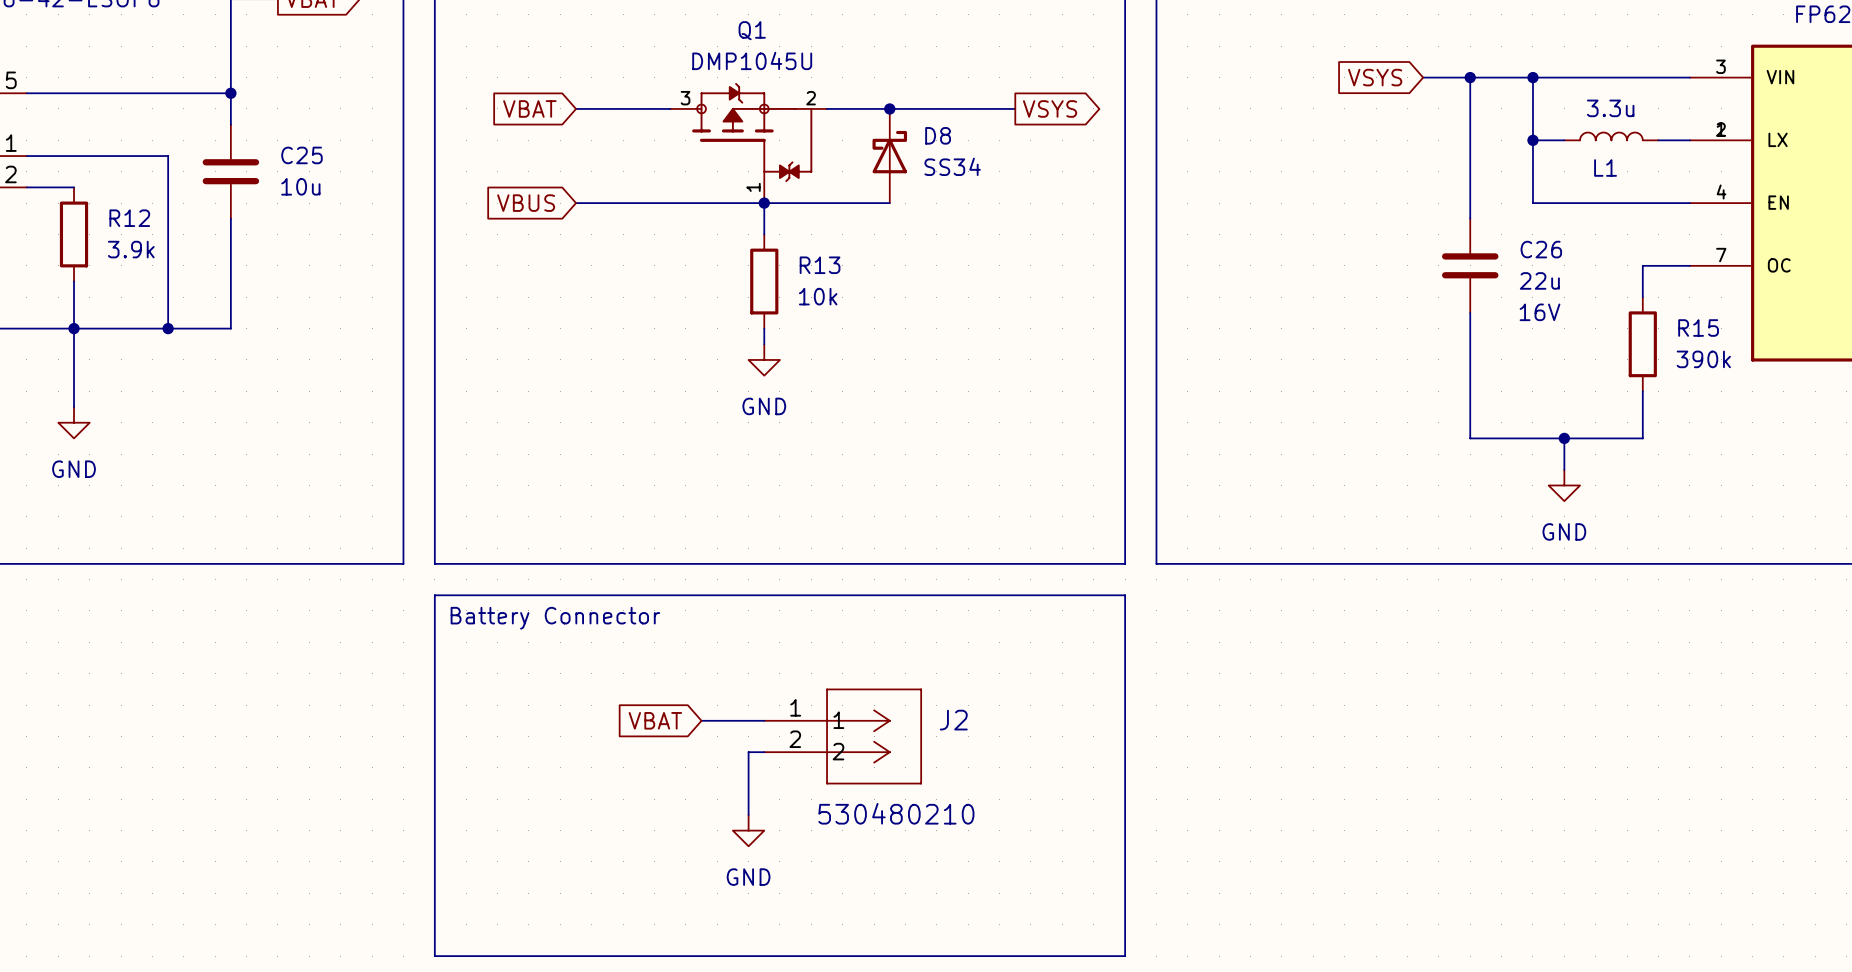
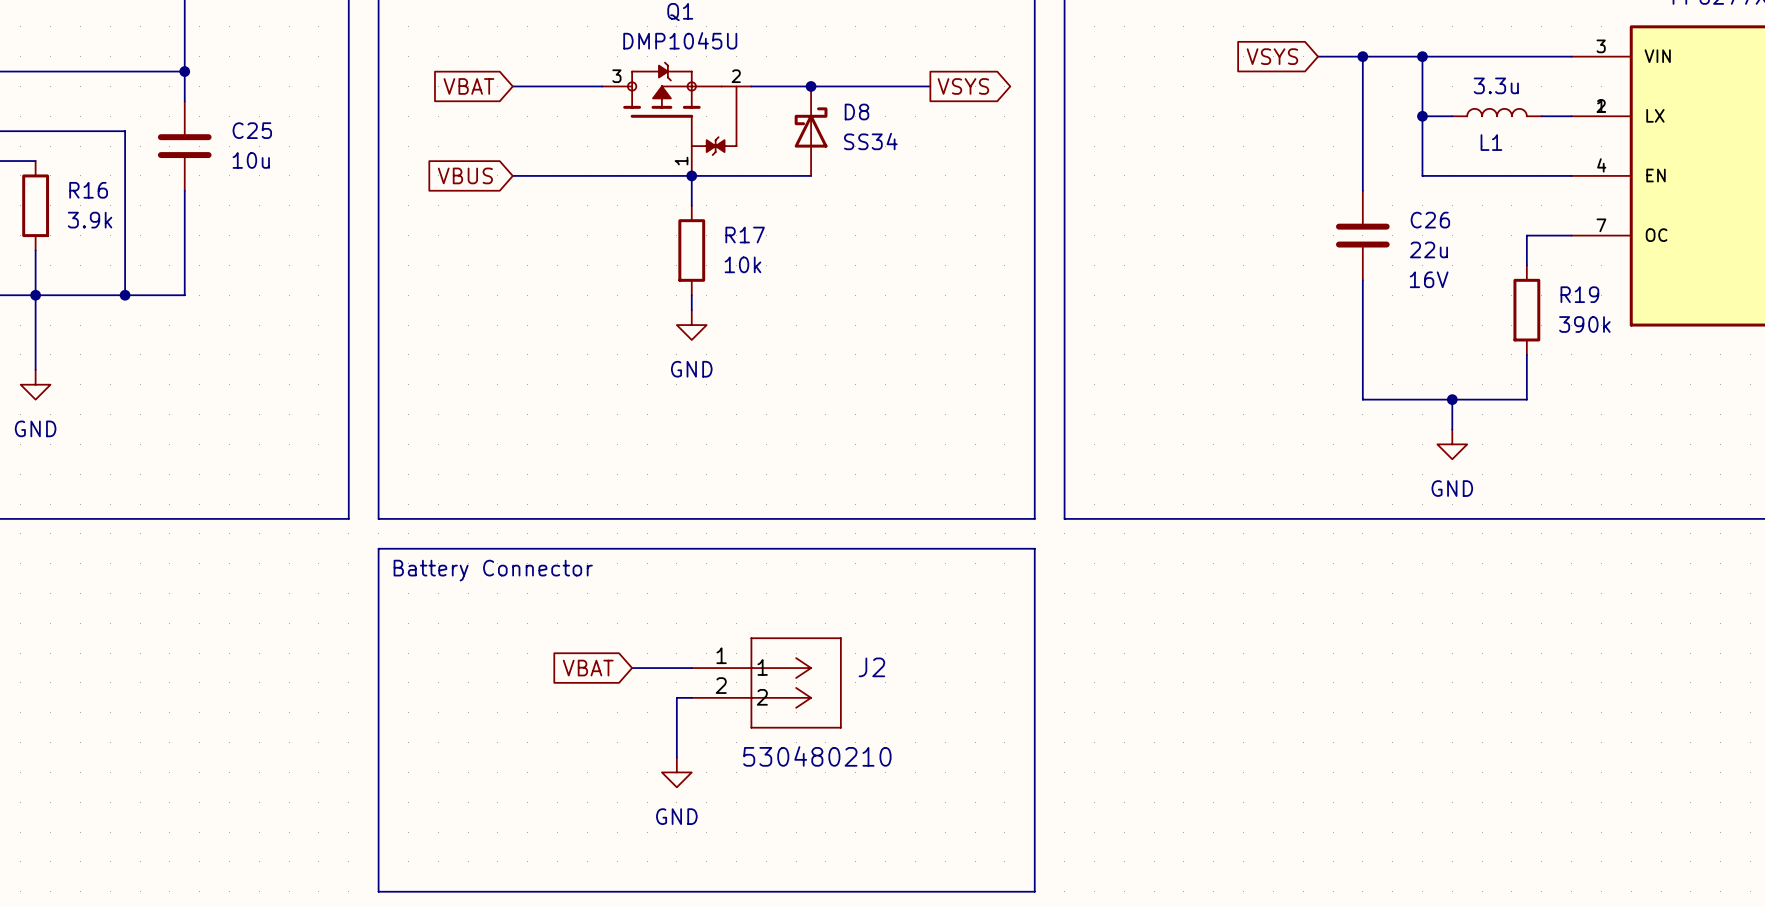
R12 name: R12 (129, 218) -> R16 (88, 190)
R13 name: R13 (820, 265) -> R17 (745, 235)
R15 name: R15 (1698, 328) -> R19 (1579, 294)

